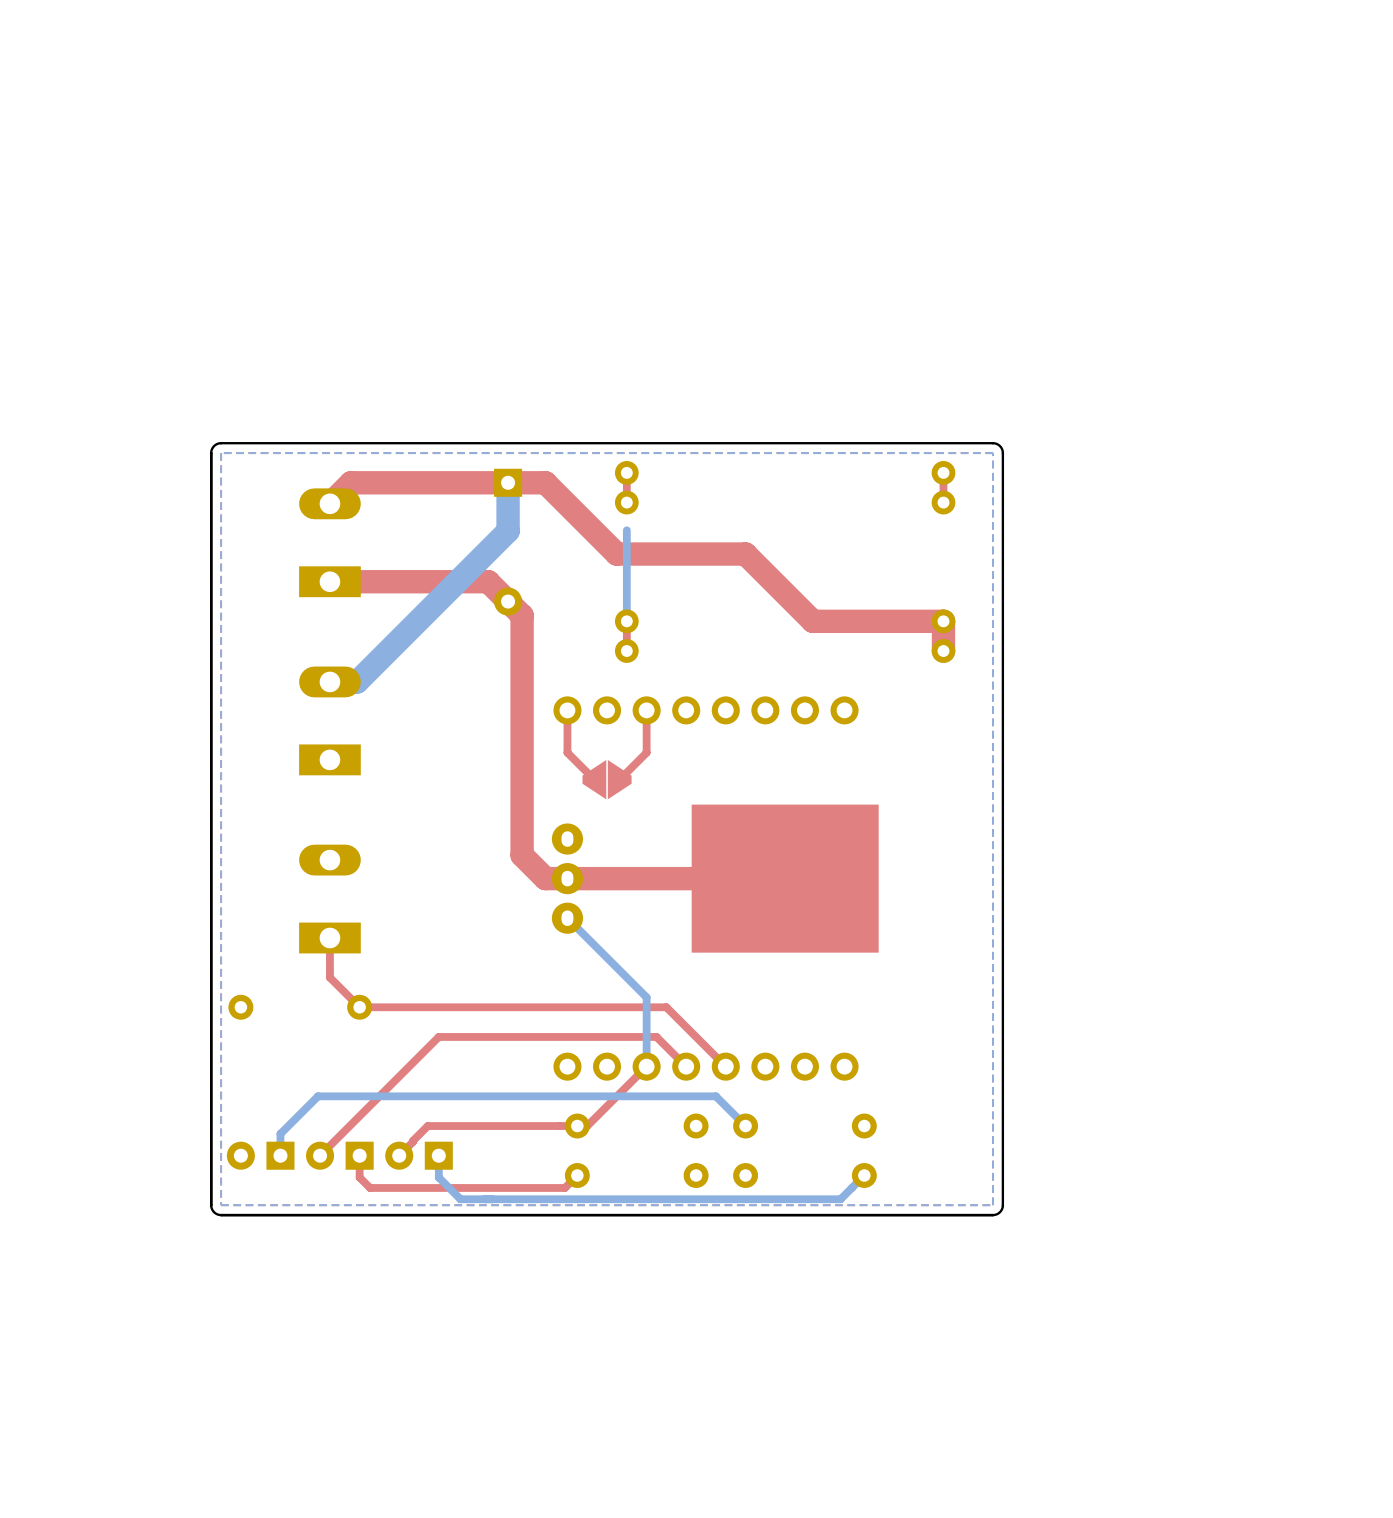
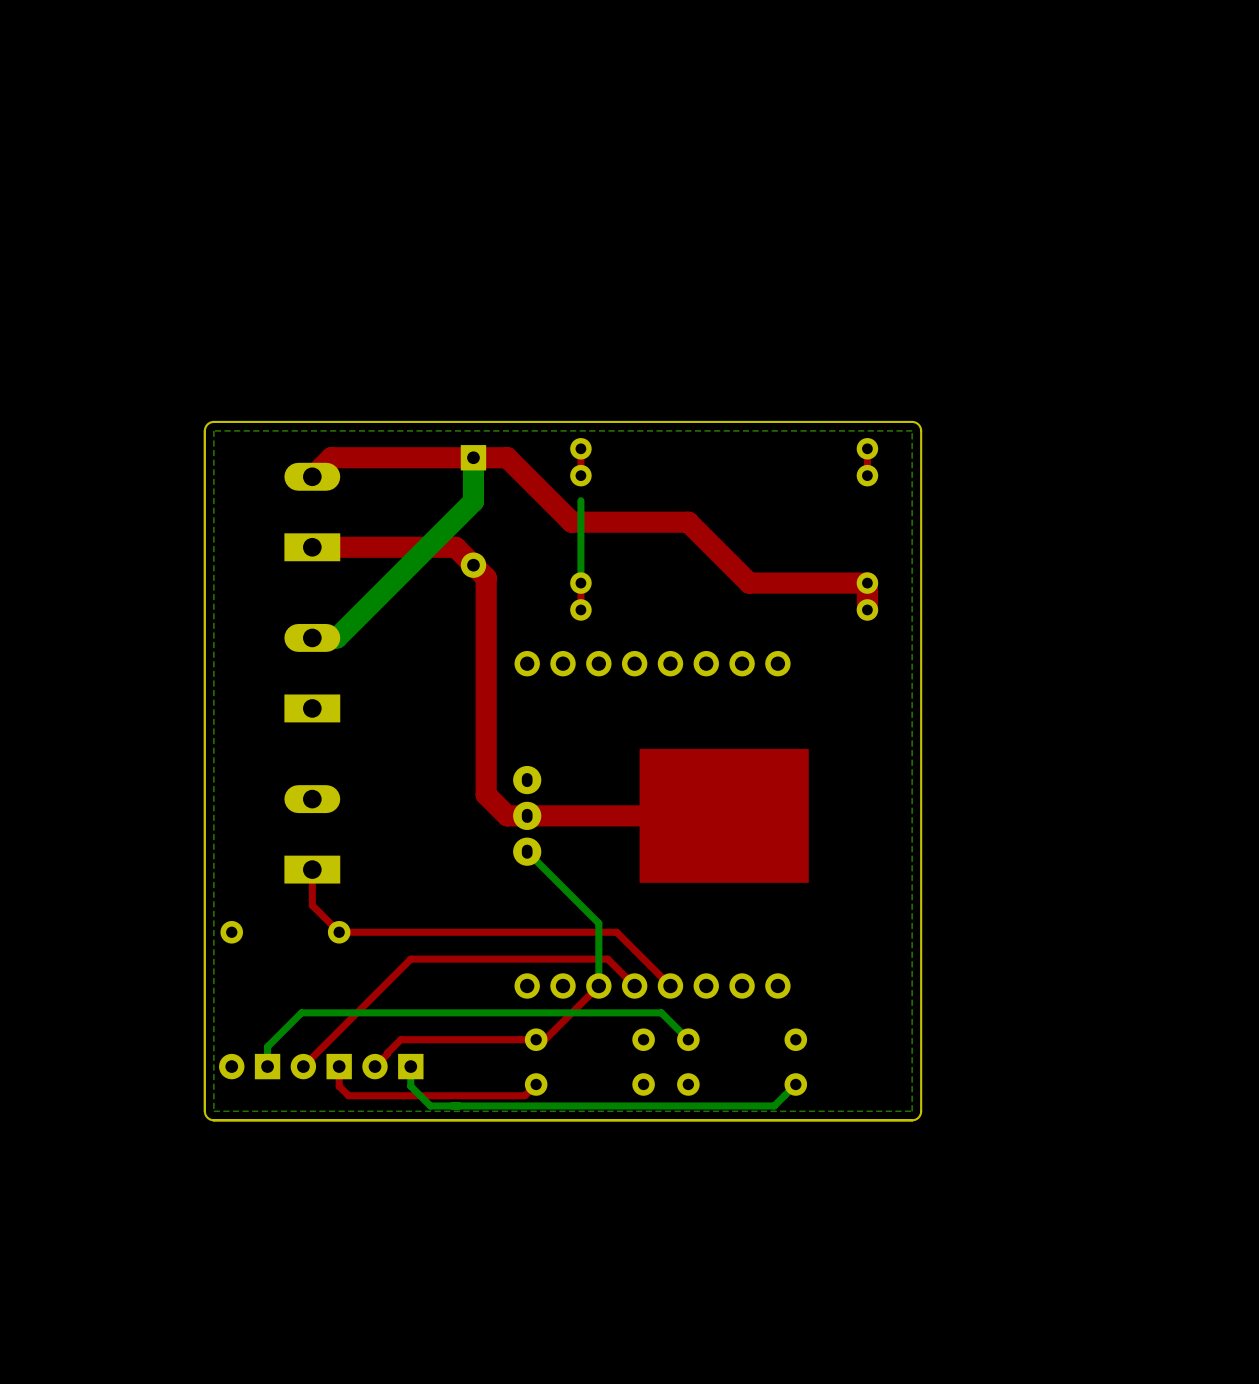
top track: (567, 710) (567, 752) (594, 779) -> none
top track: (646, 710) (646, 752) (619, 779) -> none
part: (607, 779) -> none

